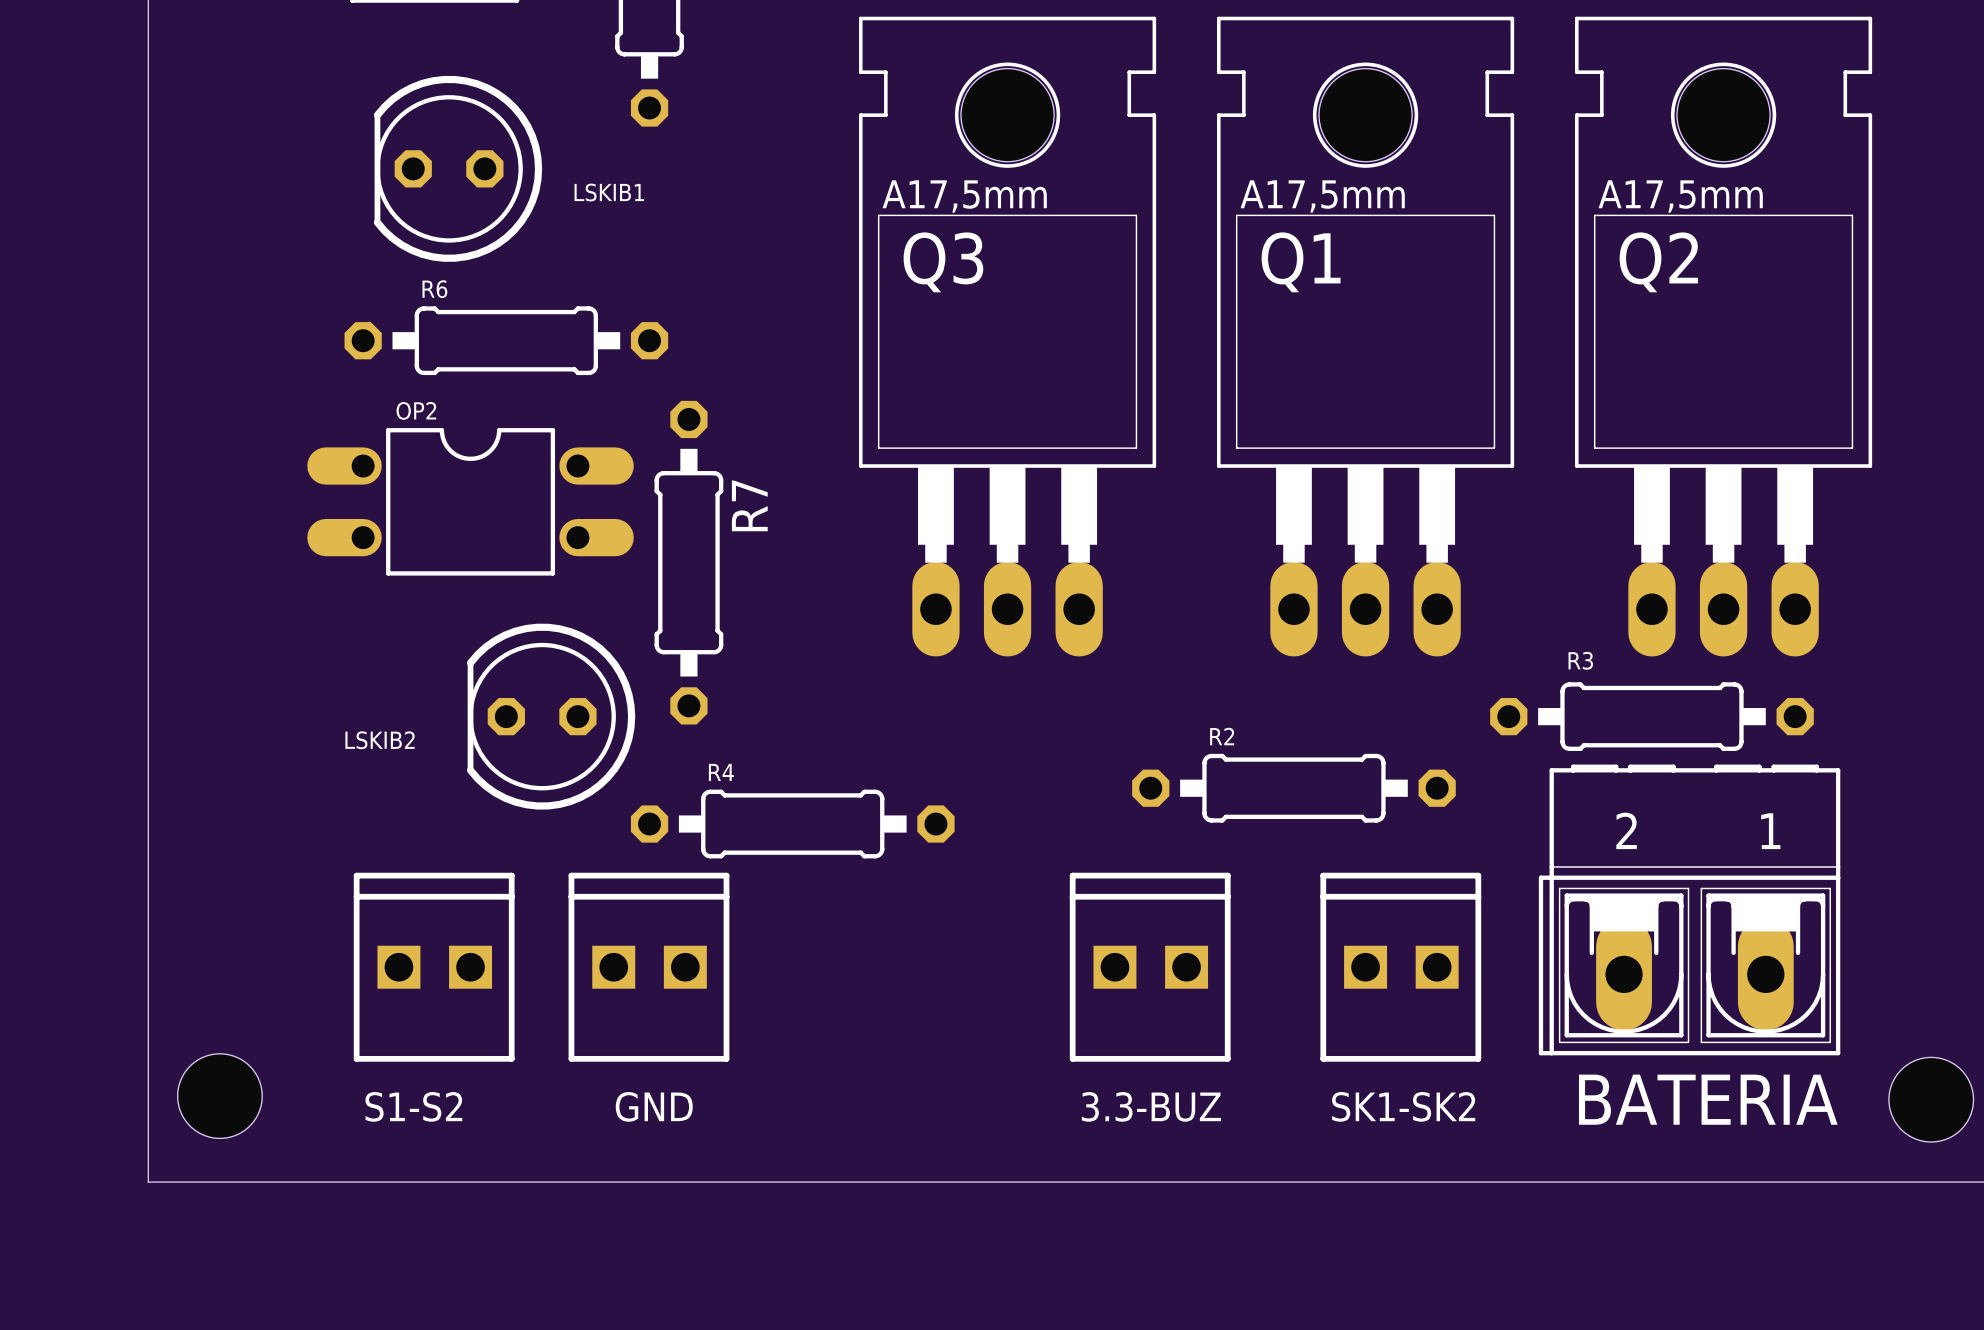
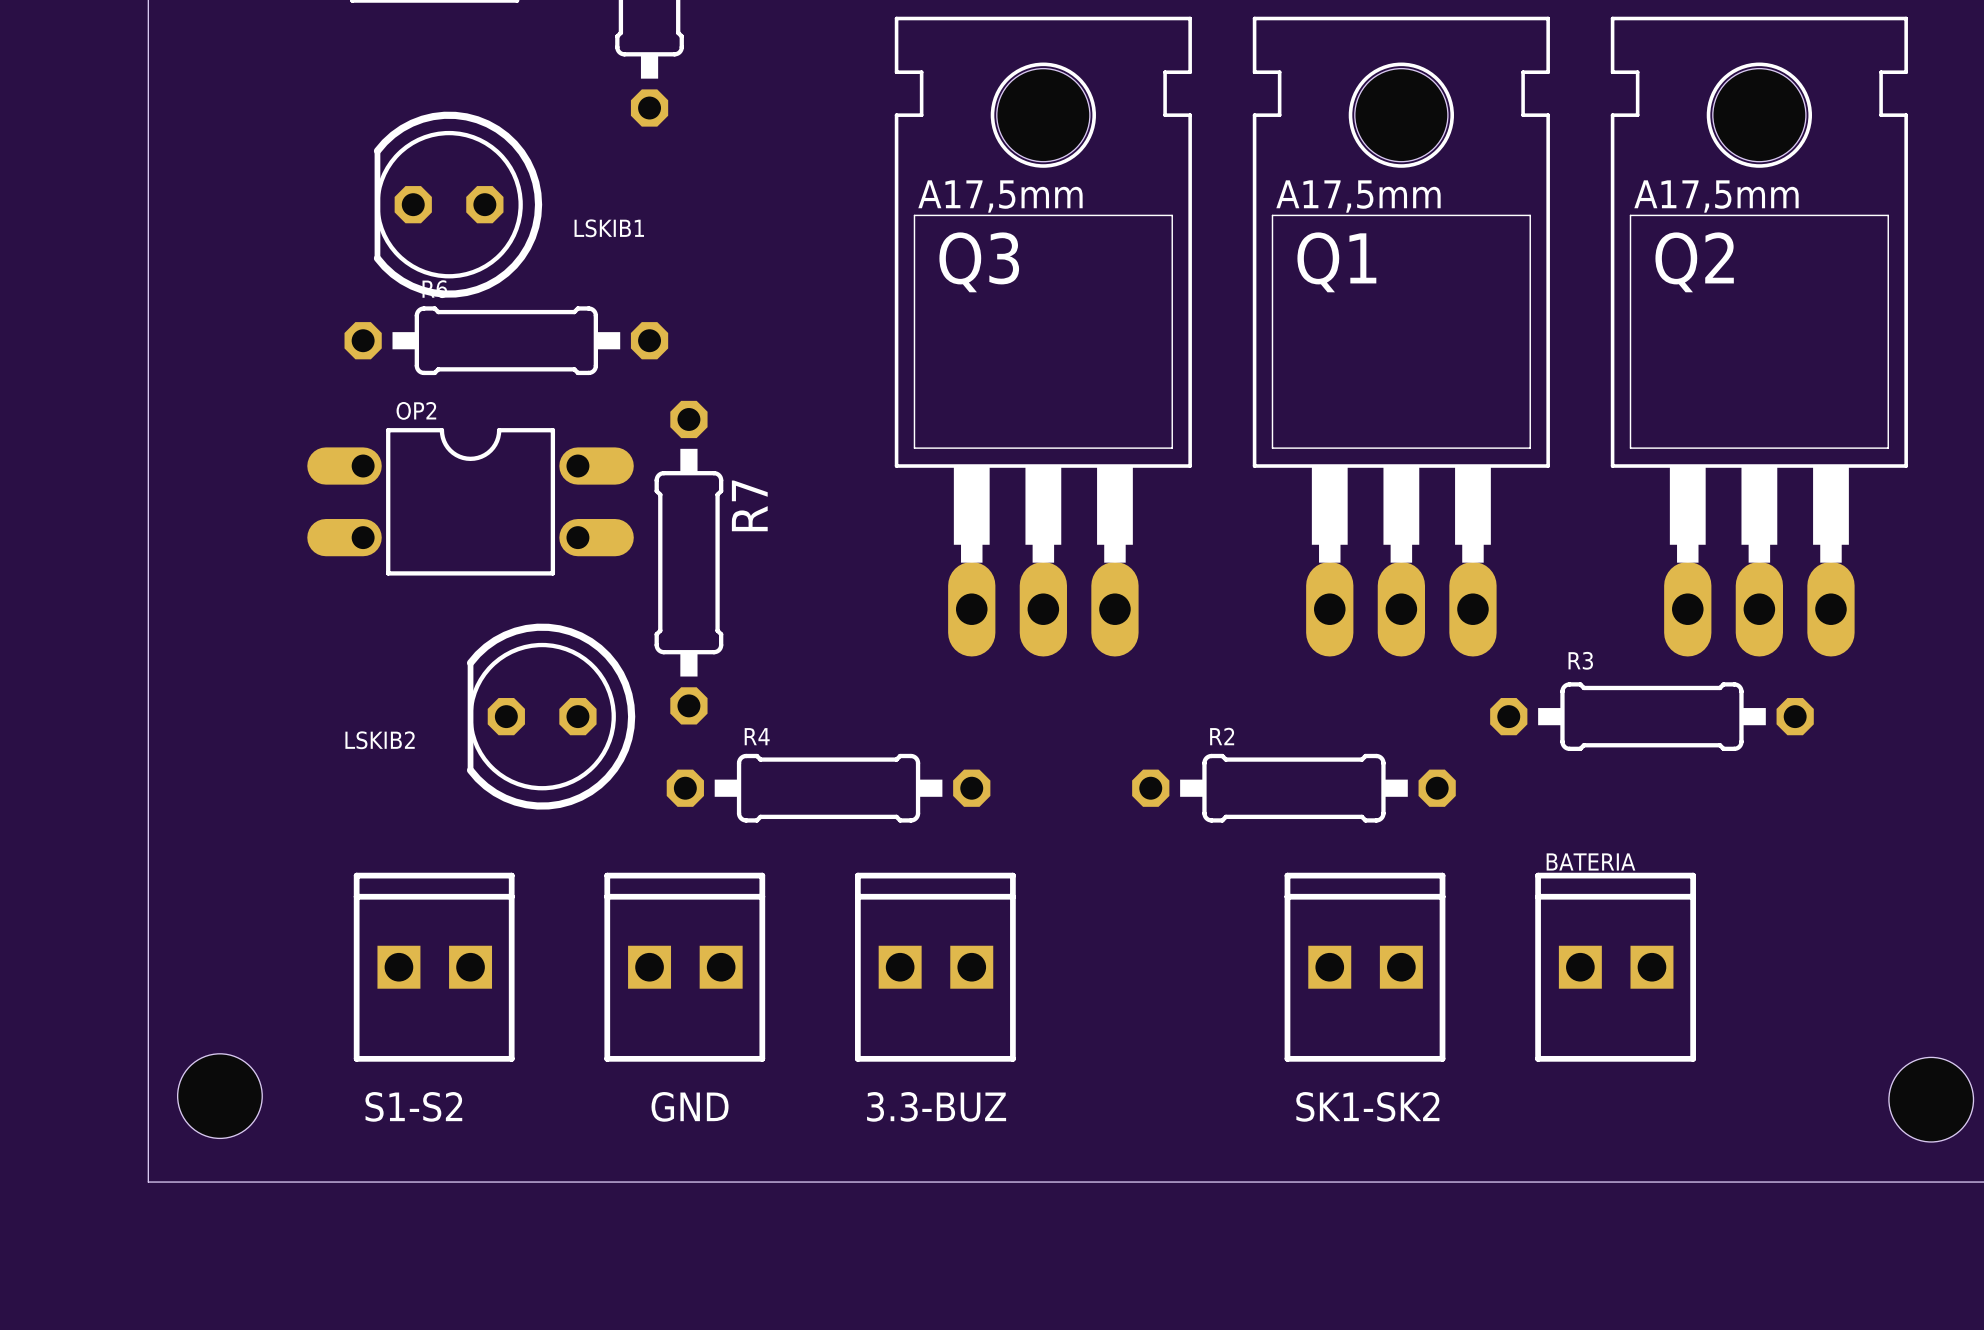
LSKIB1 position: (458, 168) -> (458, 204)
Q3 position: (1007, 336) -> (1043, 336)
Q1 position: (1365, 336) -> (1401, 336)
Q2 position: (1723, 336) -> (1759, 336)
R4 position: (792, 824) -> (828, 788)
BATERIA: (1689, 909) -> none
GND position: (648, 967) -> (684, 967)
3.3-BUZ position: (1150, 967) -> (935, 967)
SK1-SK2 position: (1400, 967) -> (1365, 967)
BATERIA: none -> (1615, 967)

